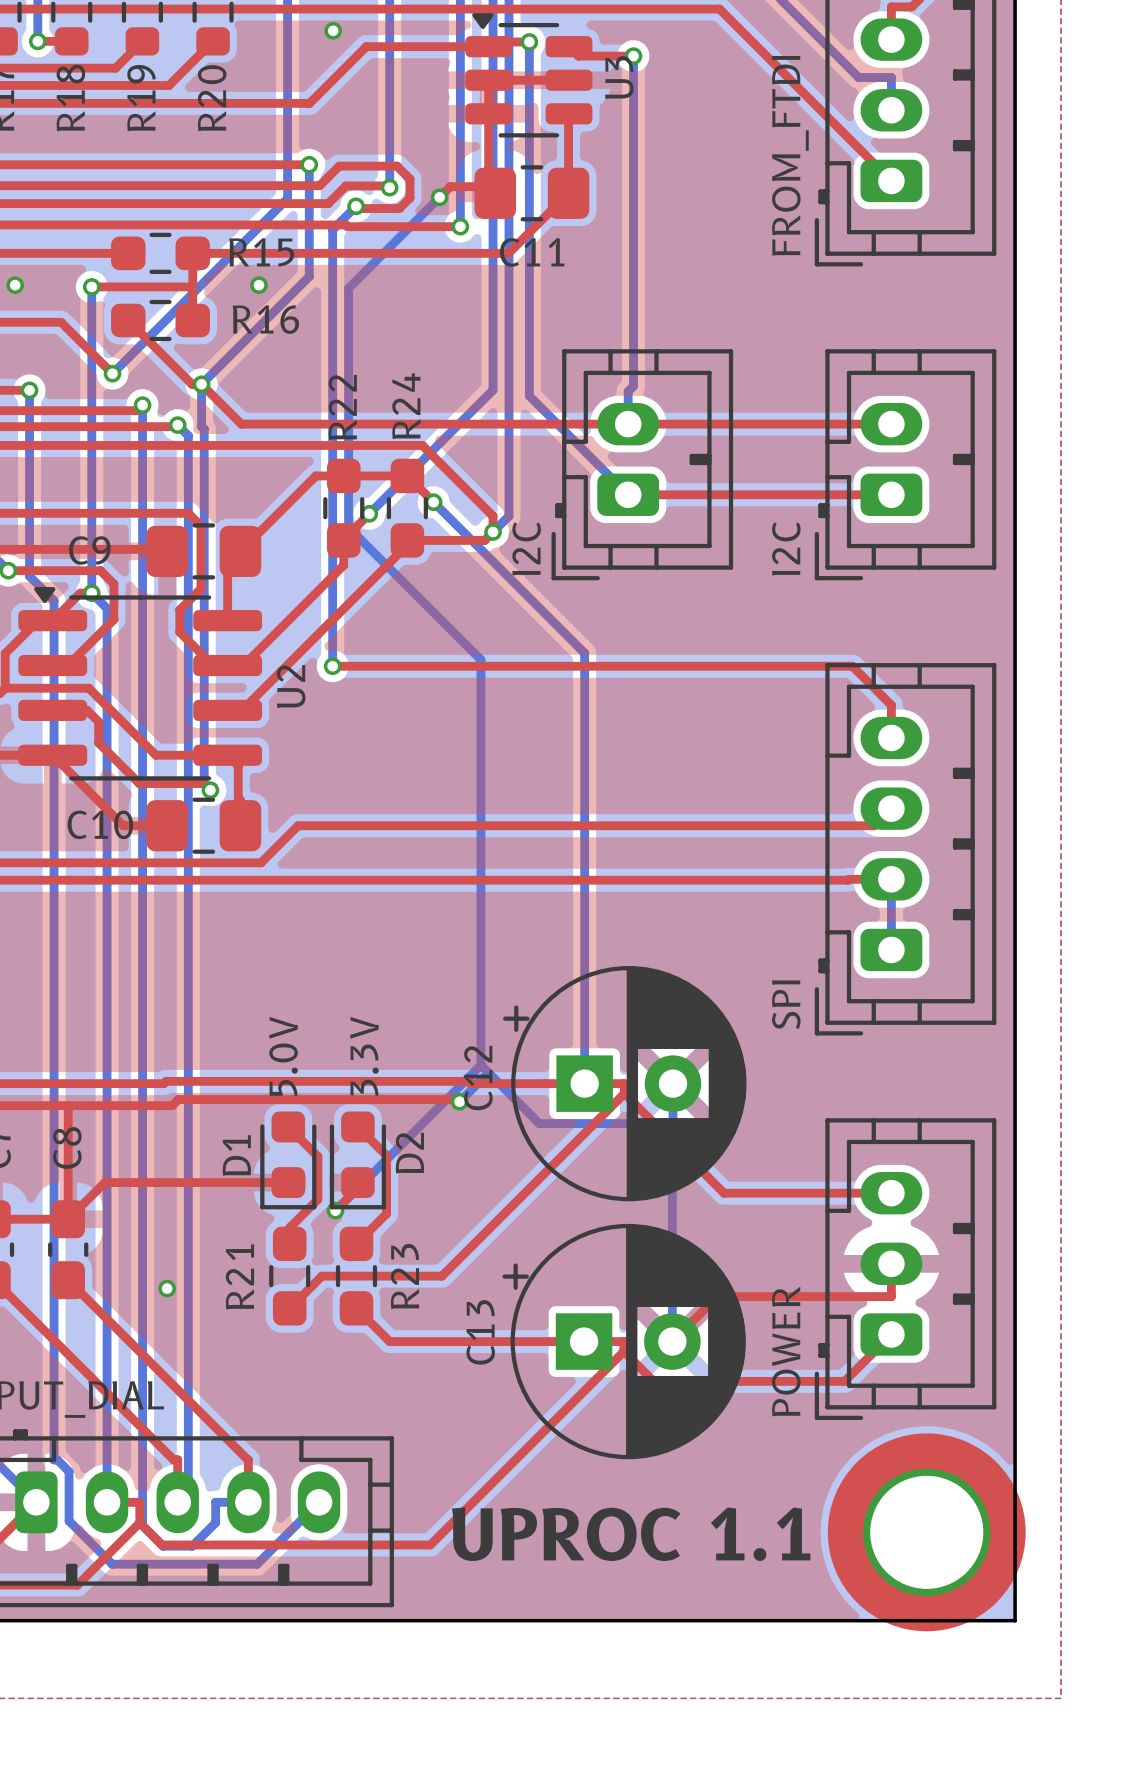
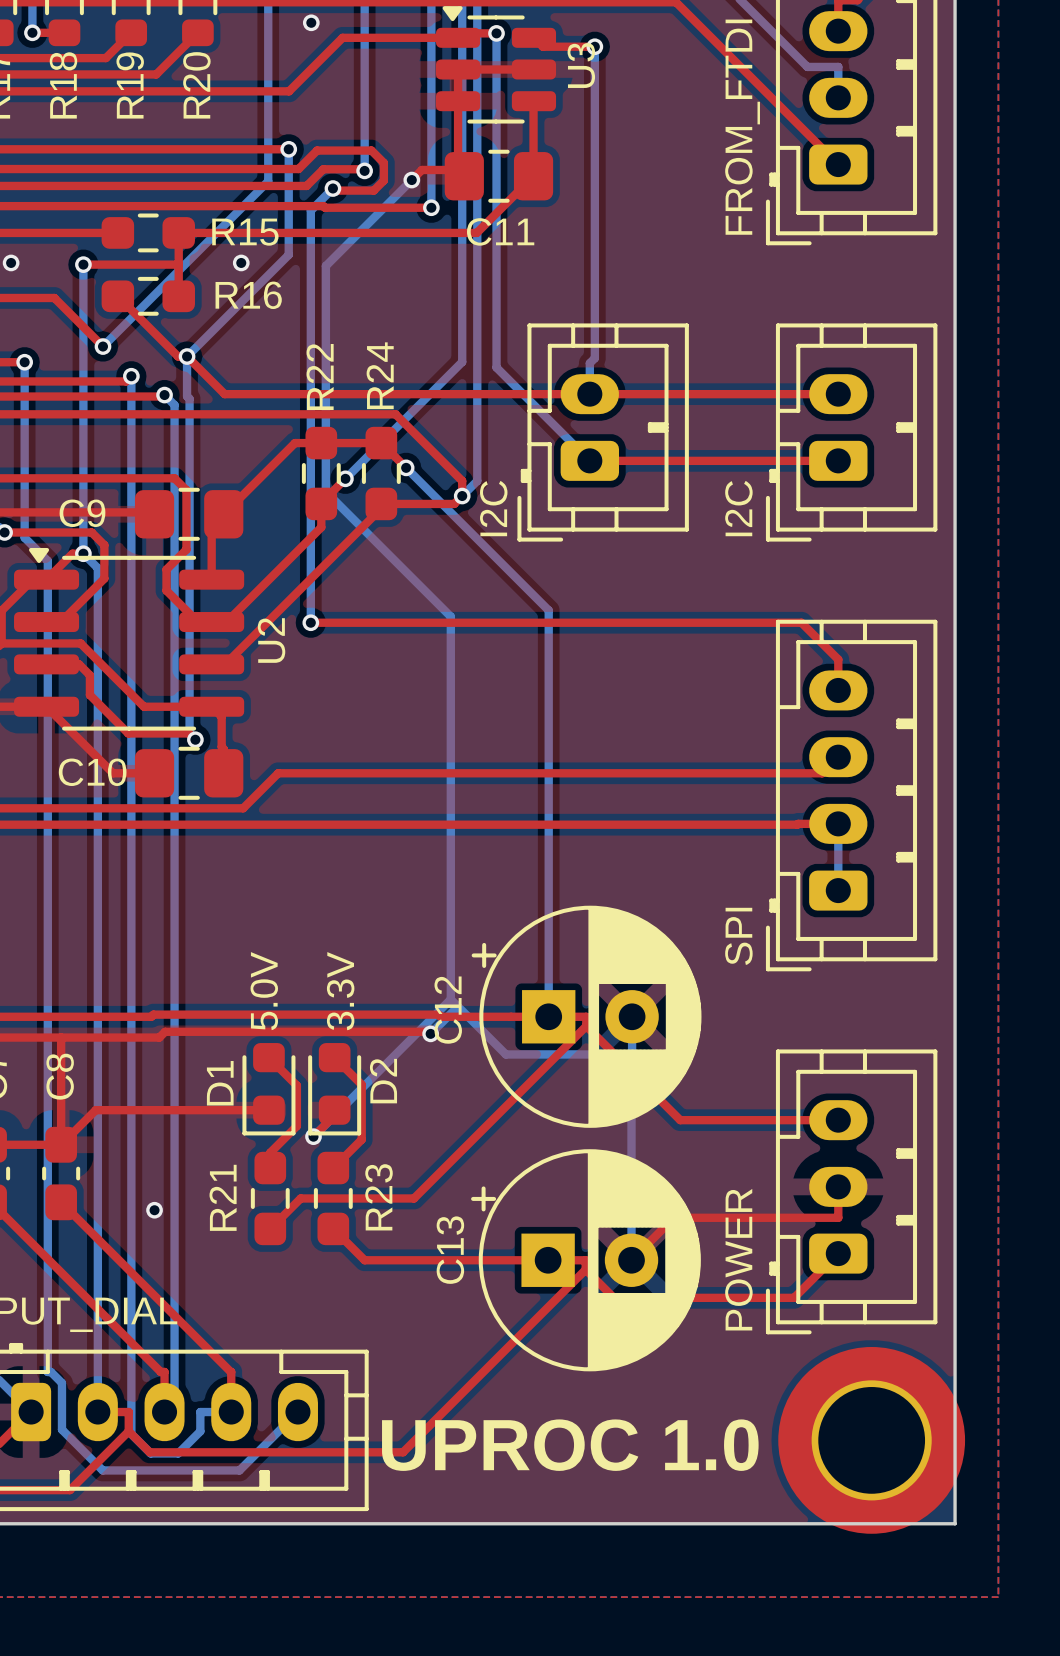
text: UPROC 1.1 (631, 1534) -> UPROC 1.0 (570, 1445)

